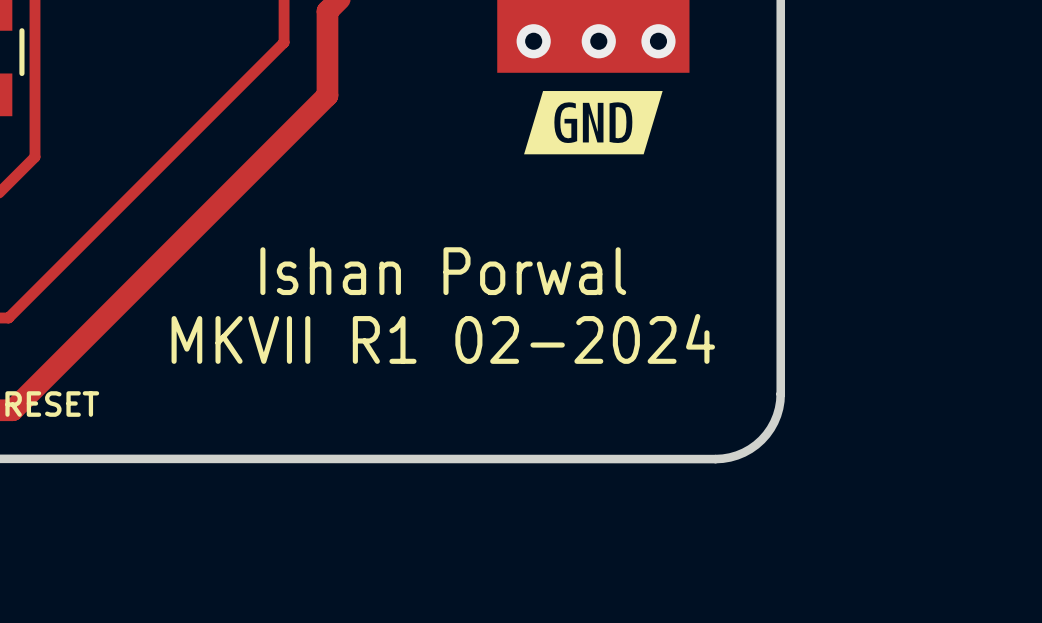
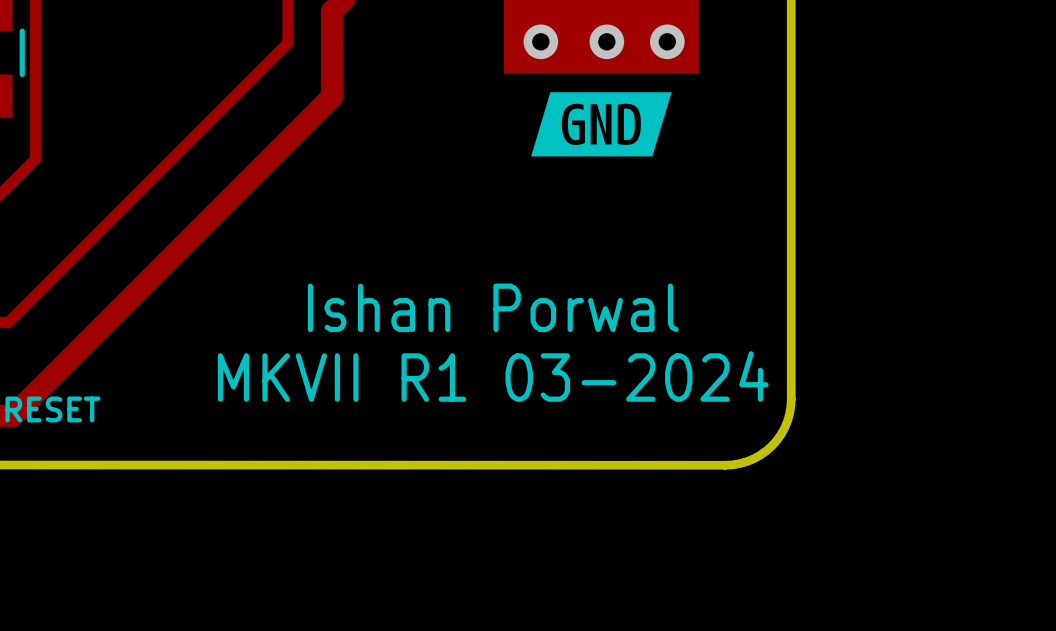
text position: Ishan Porwal (443, 271) -> Ishan Porwal (493, 307)
text: MKVII R1 02-2024 (443, 338) -> MKVII R1 03-2024 (493, 376)

